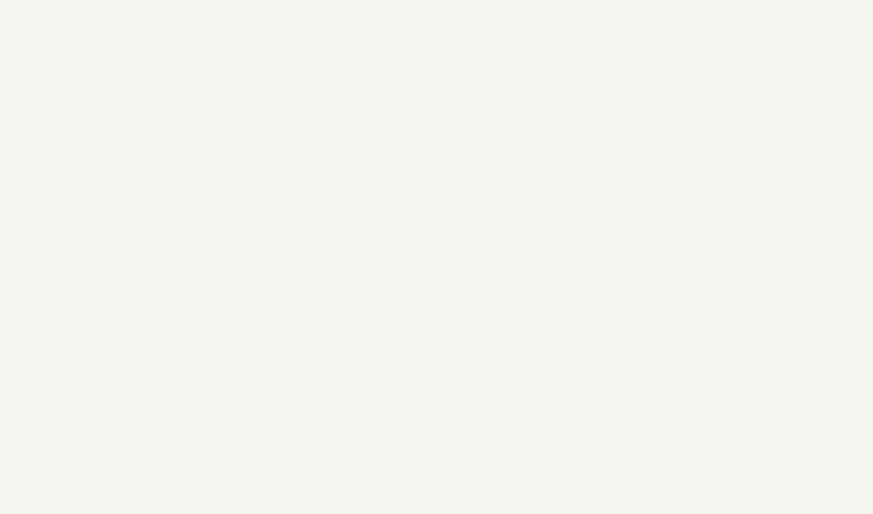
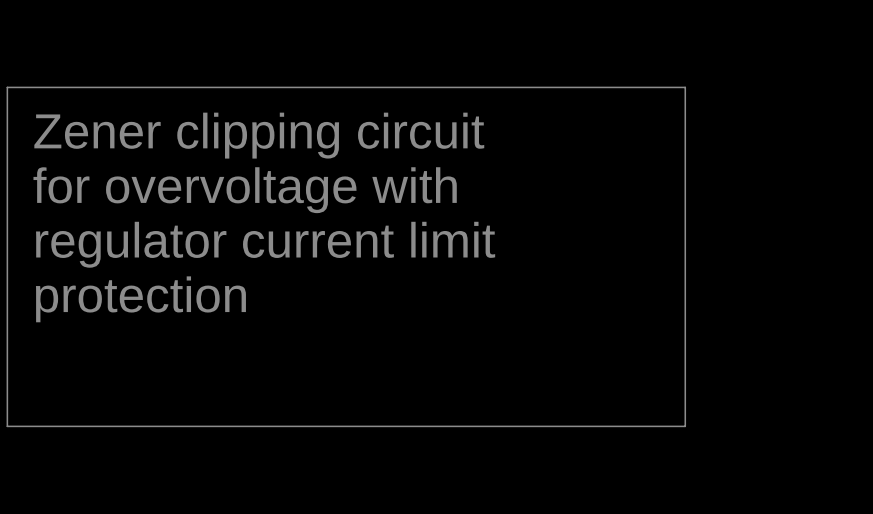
line: none -> (7, 87) (685, 87) (685, 426) (7, 426) (7, 87)
text: none -> Zener clipping circuit (259, 135)
text: none -> for overvoltage with (245, 190)
text: none -> regulator current limit (265, 244)
text: none -> protection (140, 299)

